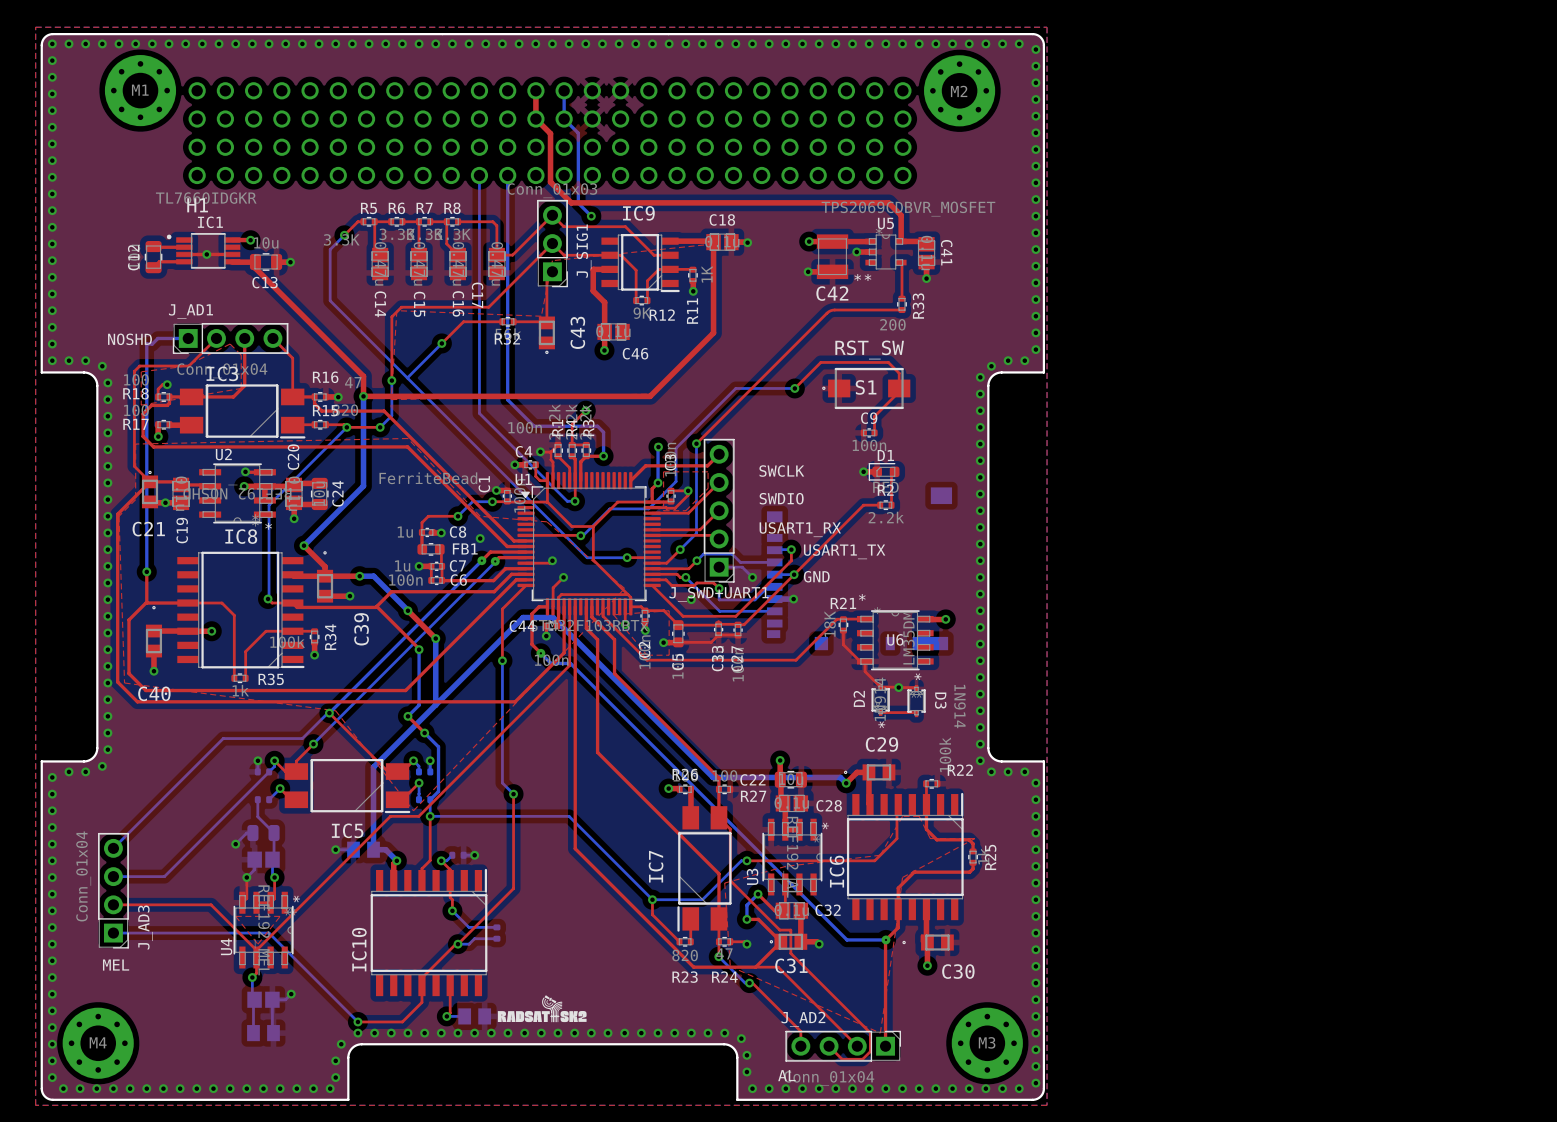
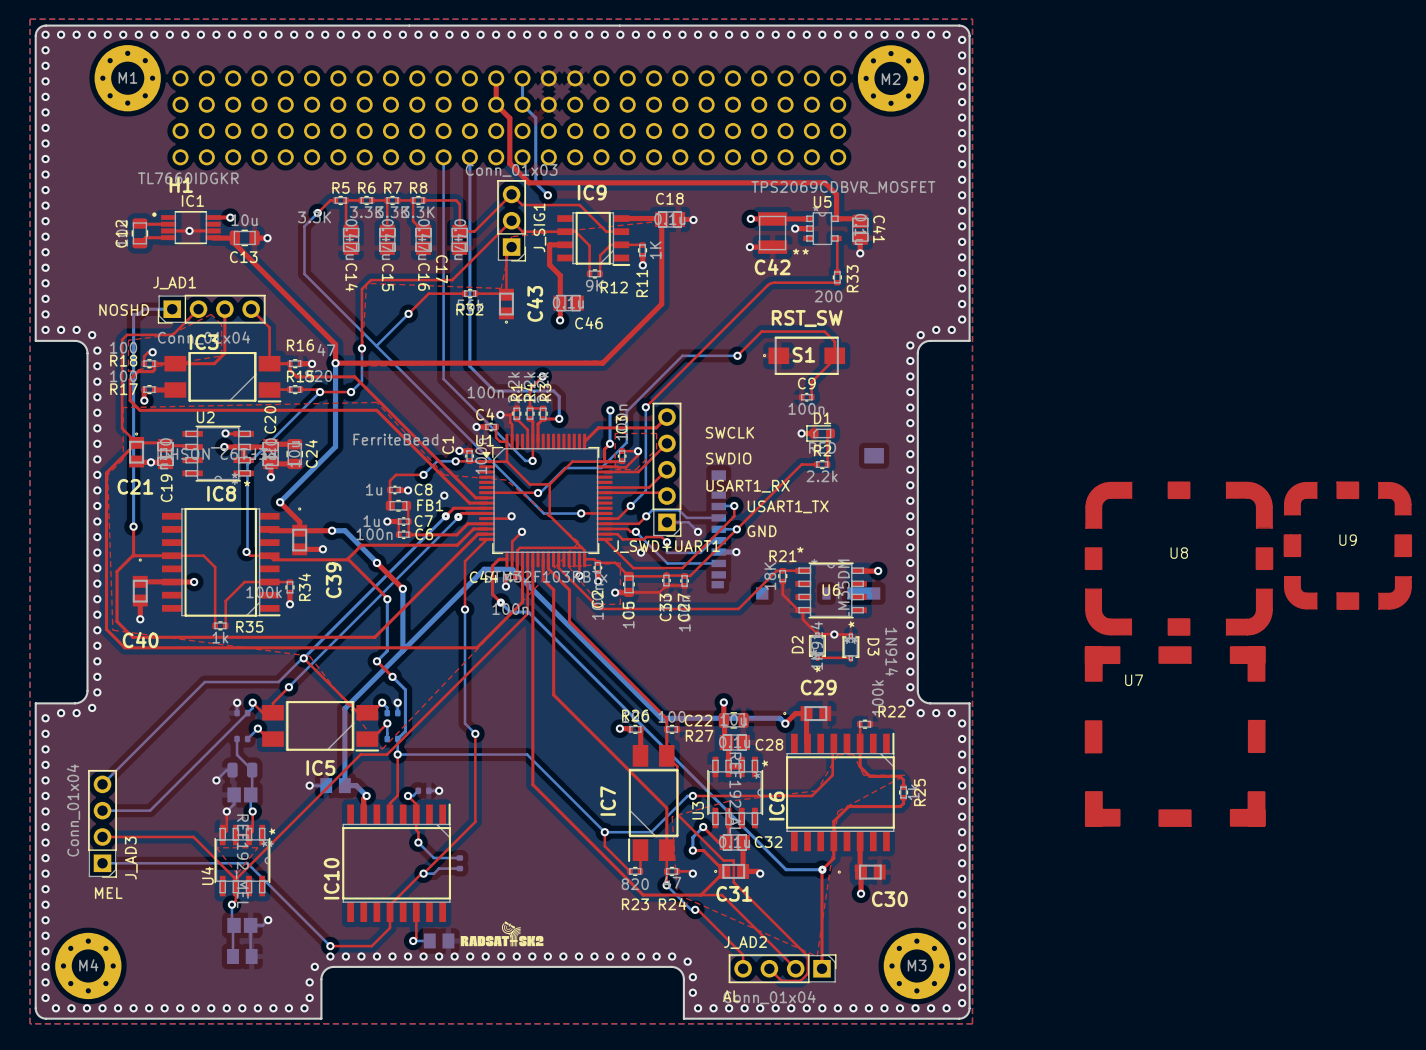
U9: none -> (1347, 545)
U8: none -> (1179, 558)
U7: none -> (1175, 736)

